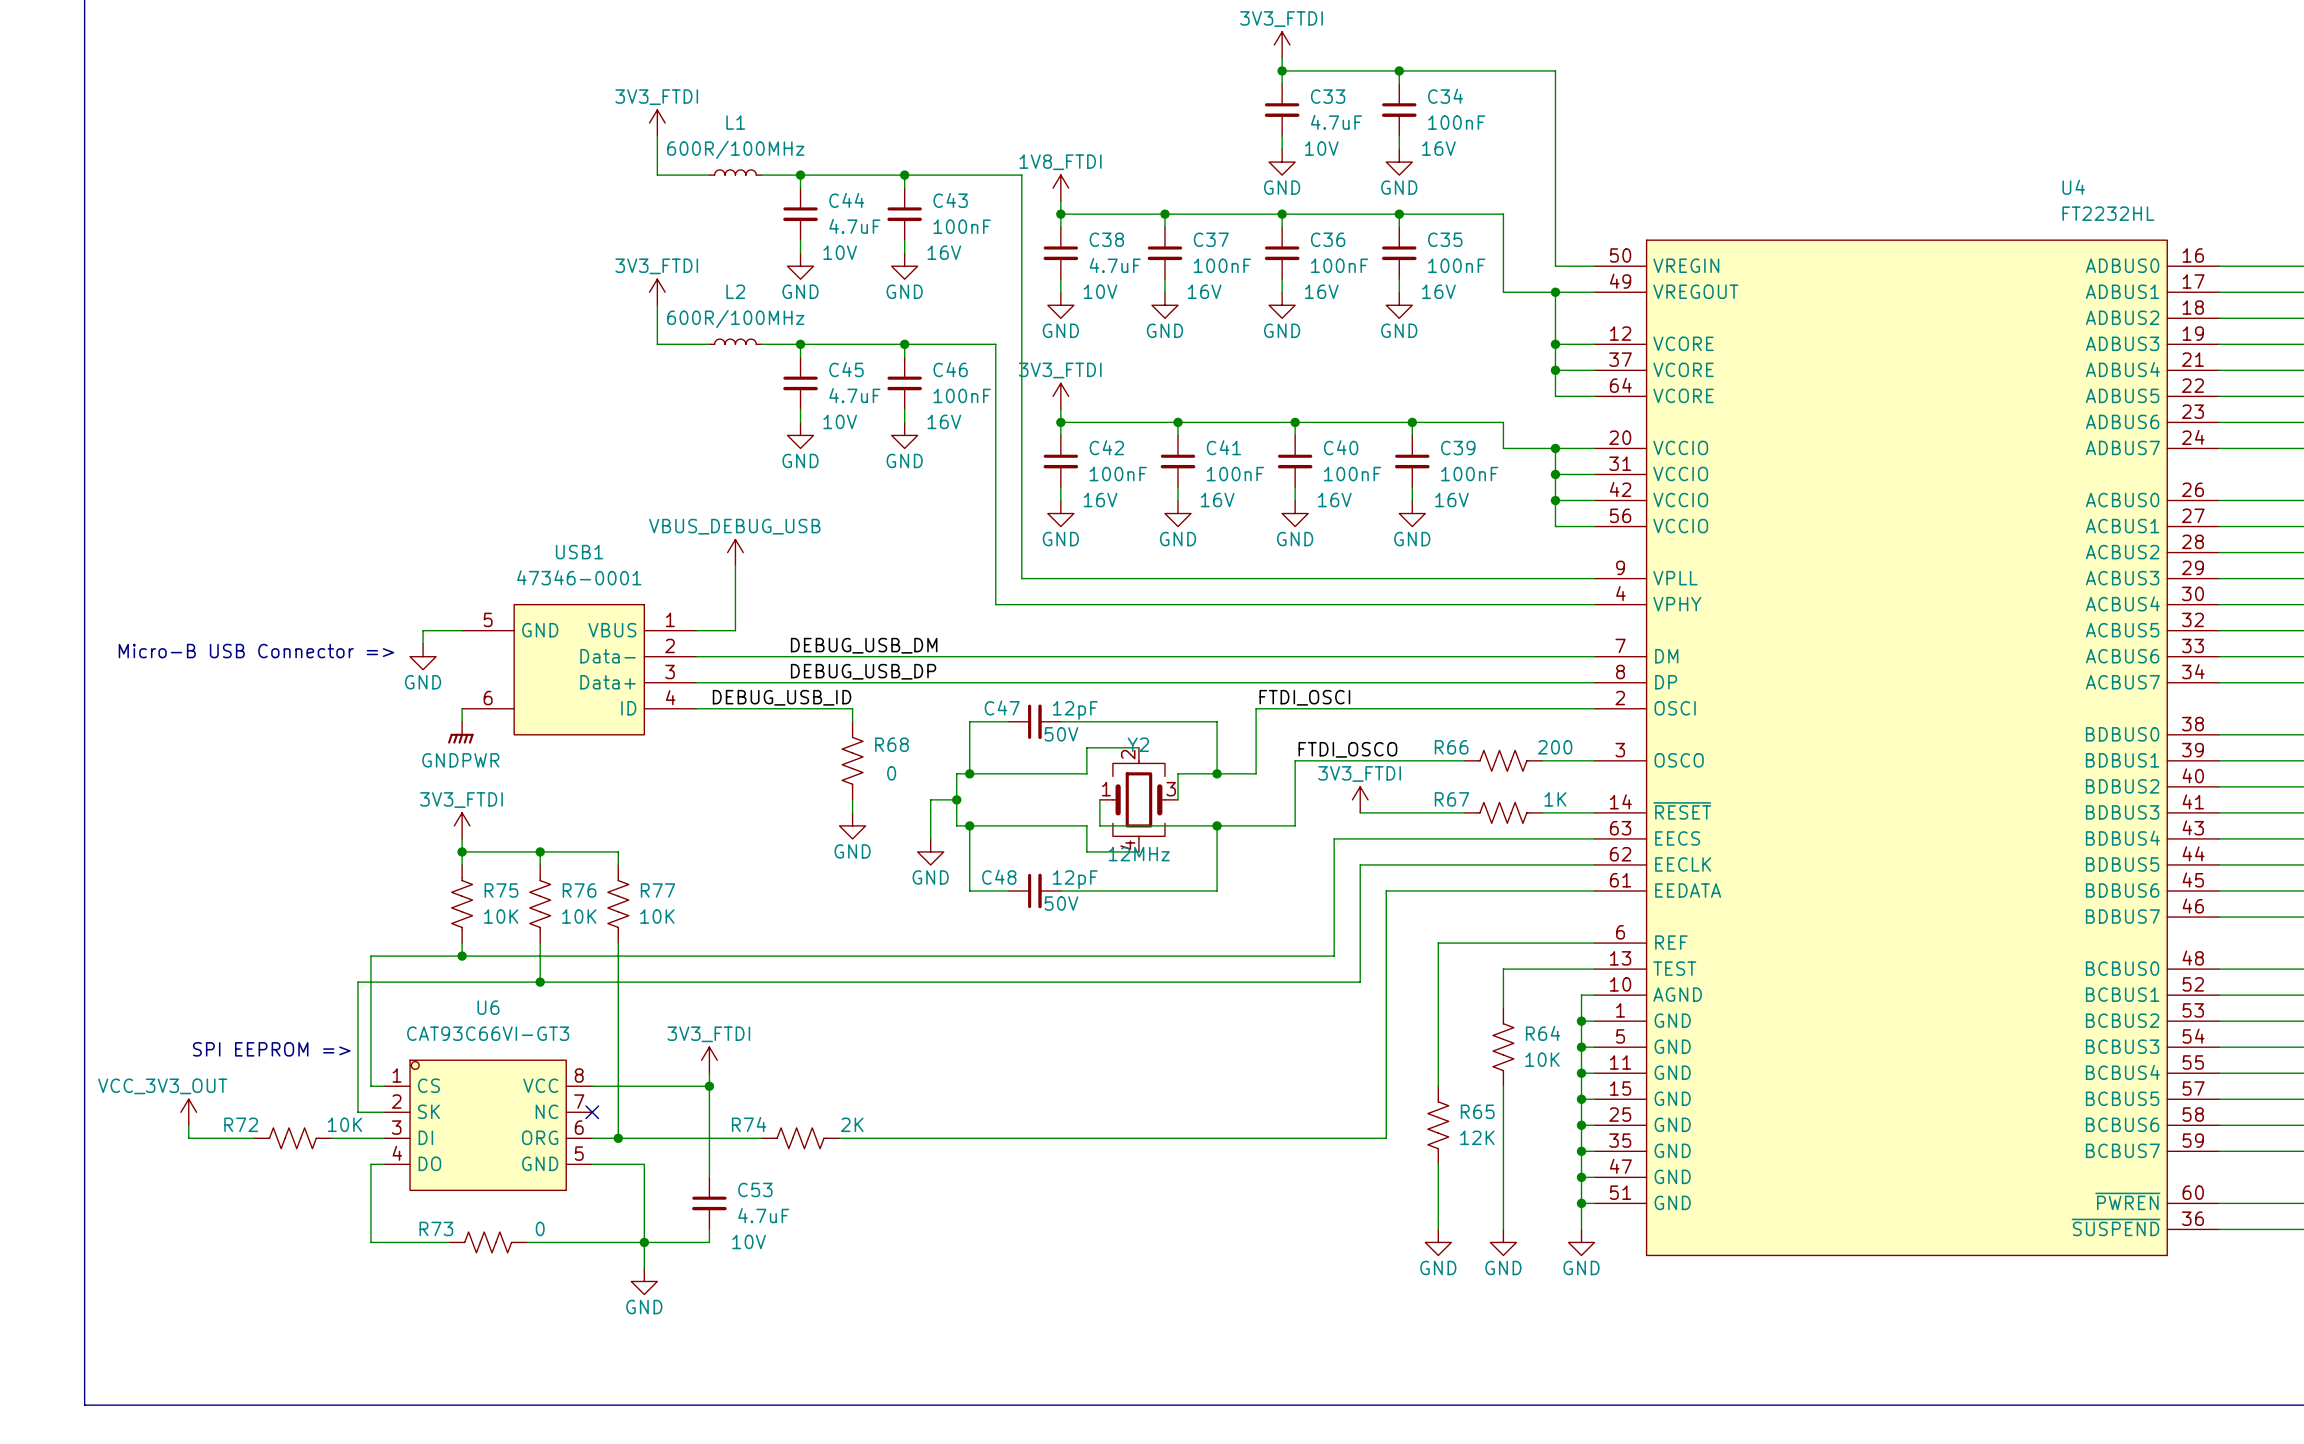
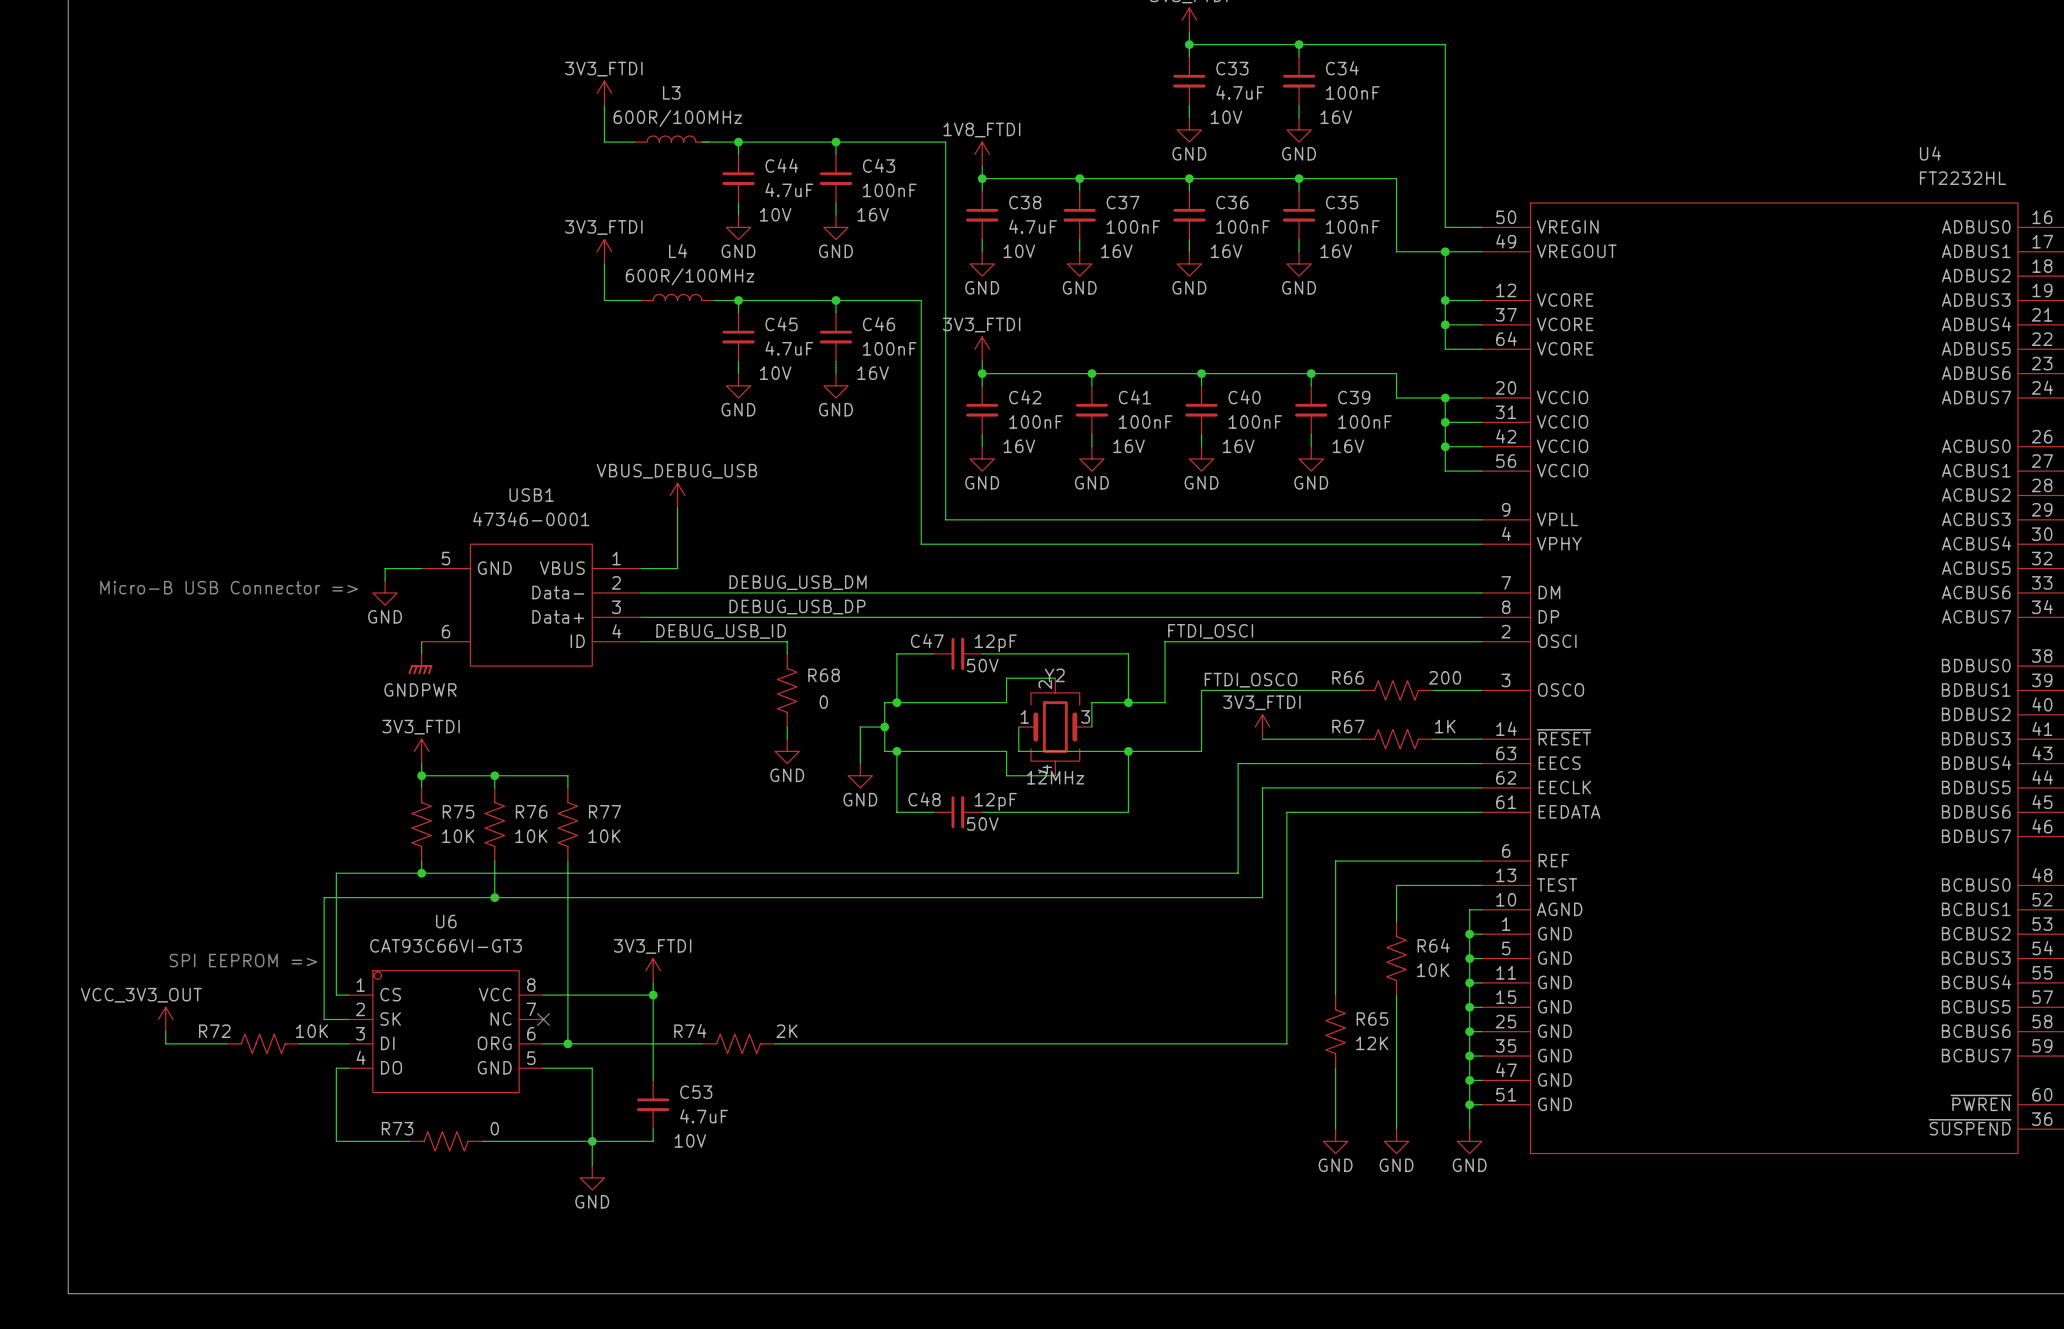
L3: none -> 600R/100MHz (671, 139)
L1: 600R/100MHz (735, 172) -> none
L2: 600R/100MHz (735, 341) -> none
L4: none -> 600R/100MHz (677, 297)

